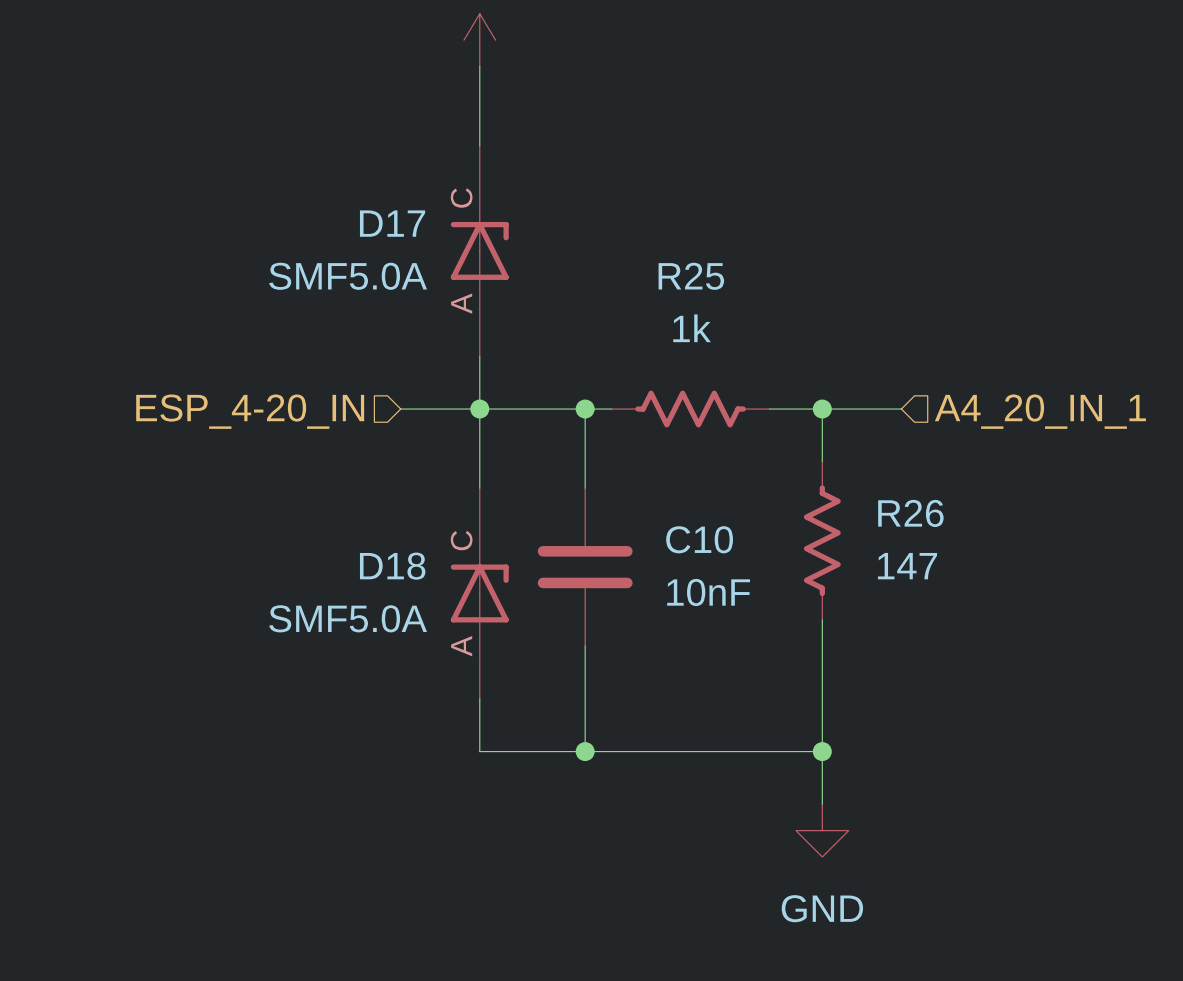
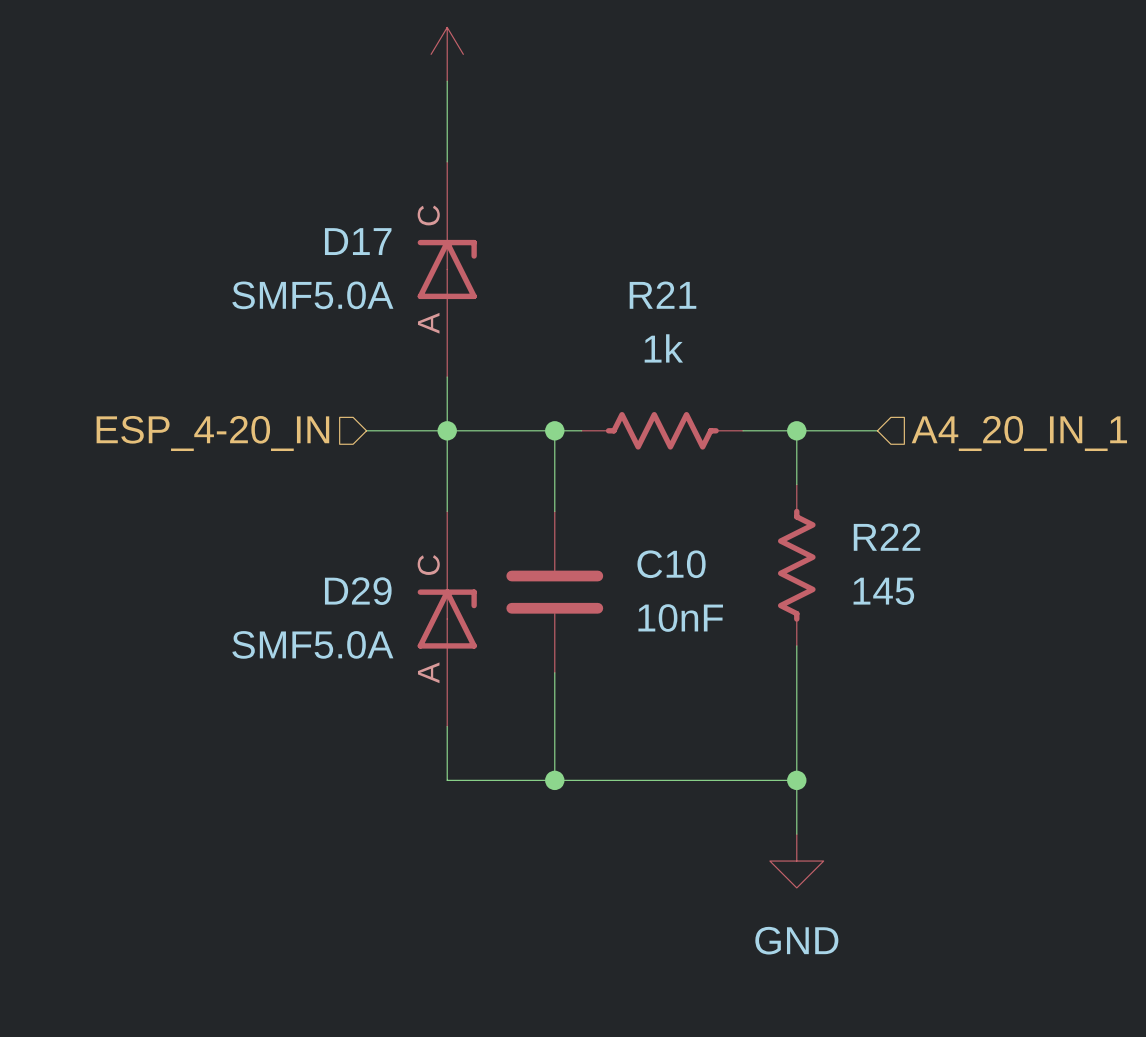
R25 name: R25 (691, 276) -> R21 (662, 295)
R26 name: R26 (910, 513) -> R22 (887, 537)
D18 name: D18 (392, 566) -> D29 (358, 591)
R26 value: 147 (907, 566) -> 145 (883, 591)

